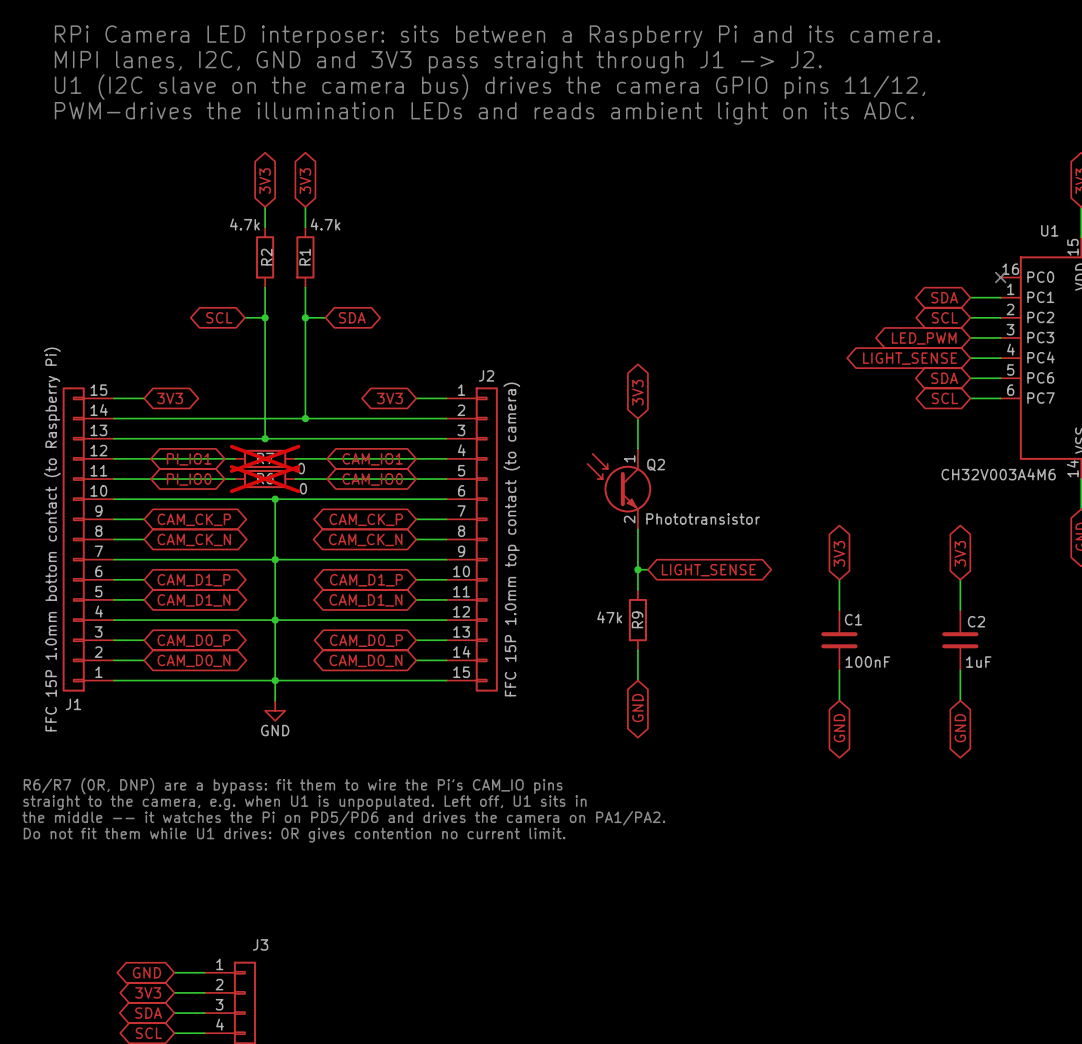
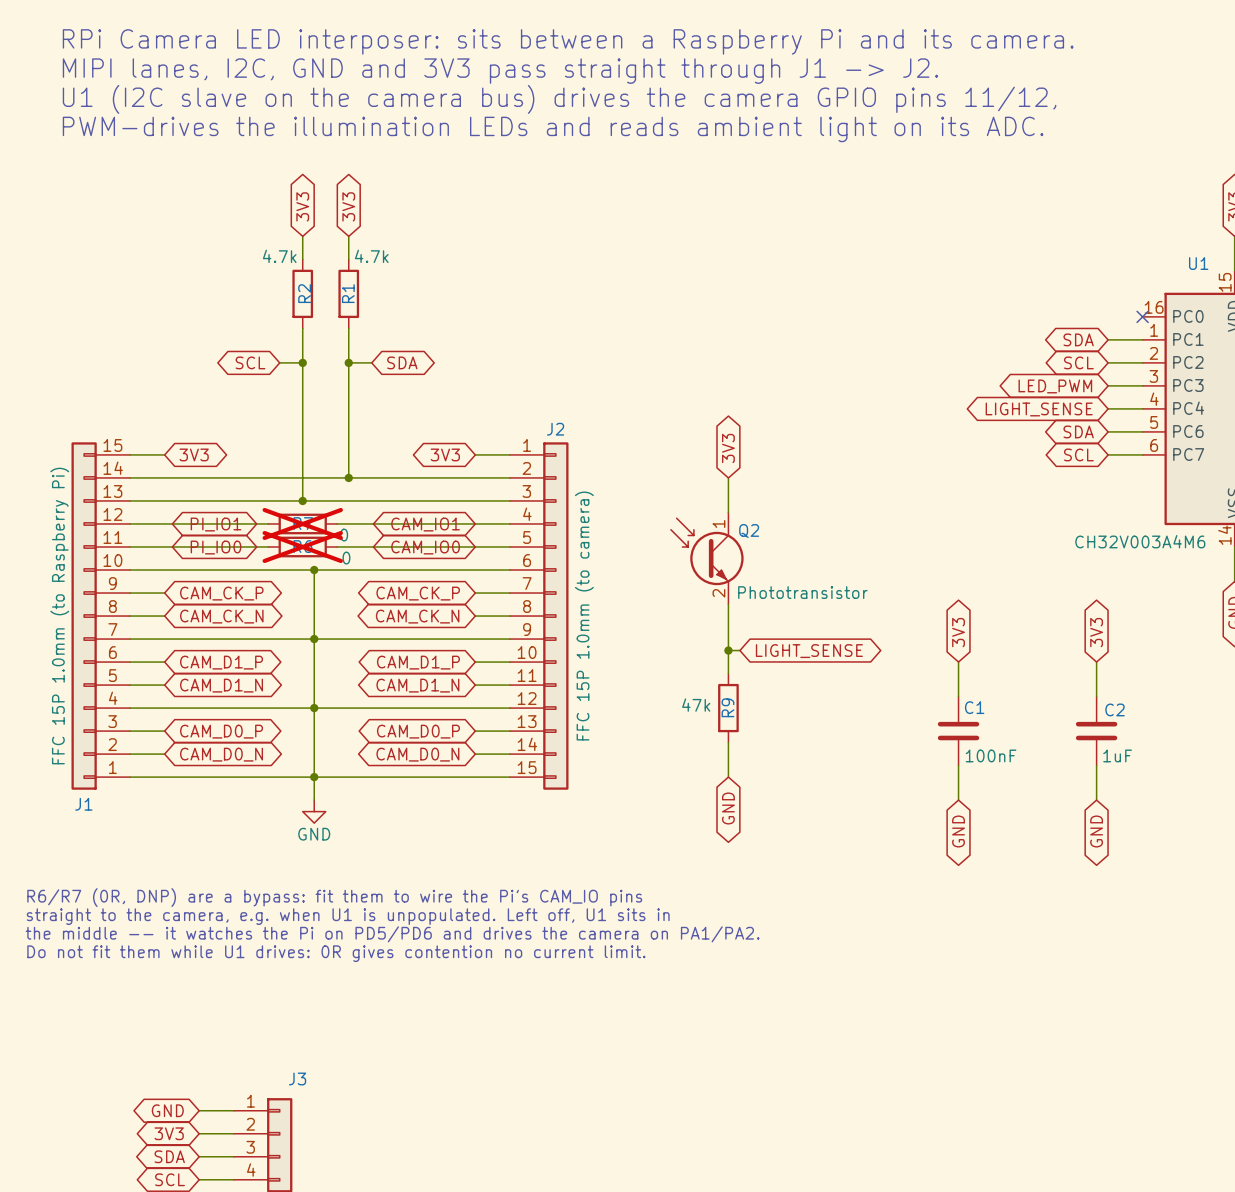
J1 value: FFC 15P 1.0mm bottom contact (to Raspberry Pi) (52, 539) -> FFC 15P 1.0mm (to Raspberry Pi) (59, 616)
J2 value: FFC 15P 1.0mm top contact (to camera) (511, 539) -> FFC 15P 1.0mm (to camera) (584, 616)

